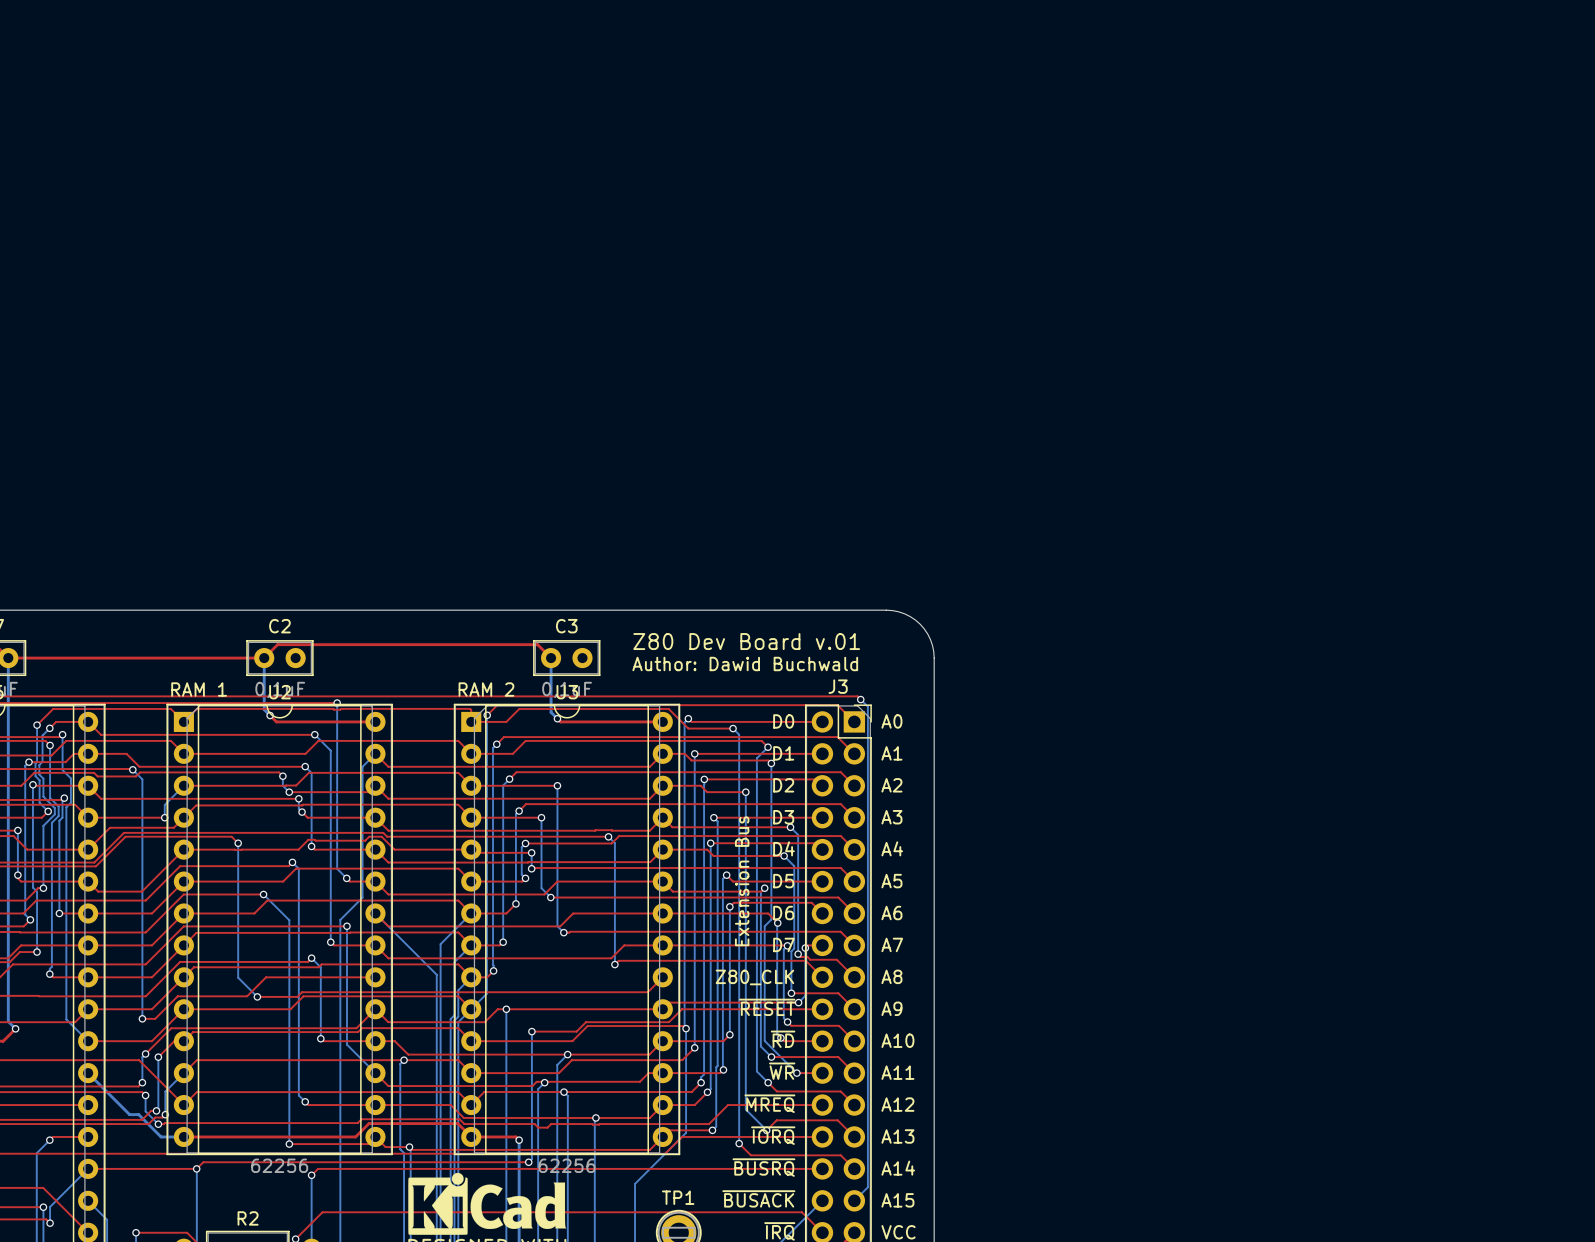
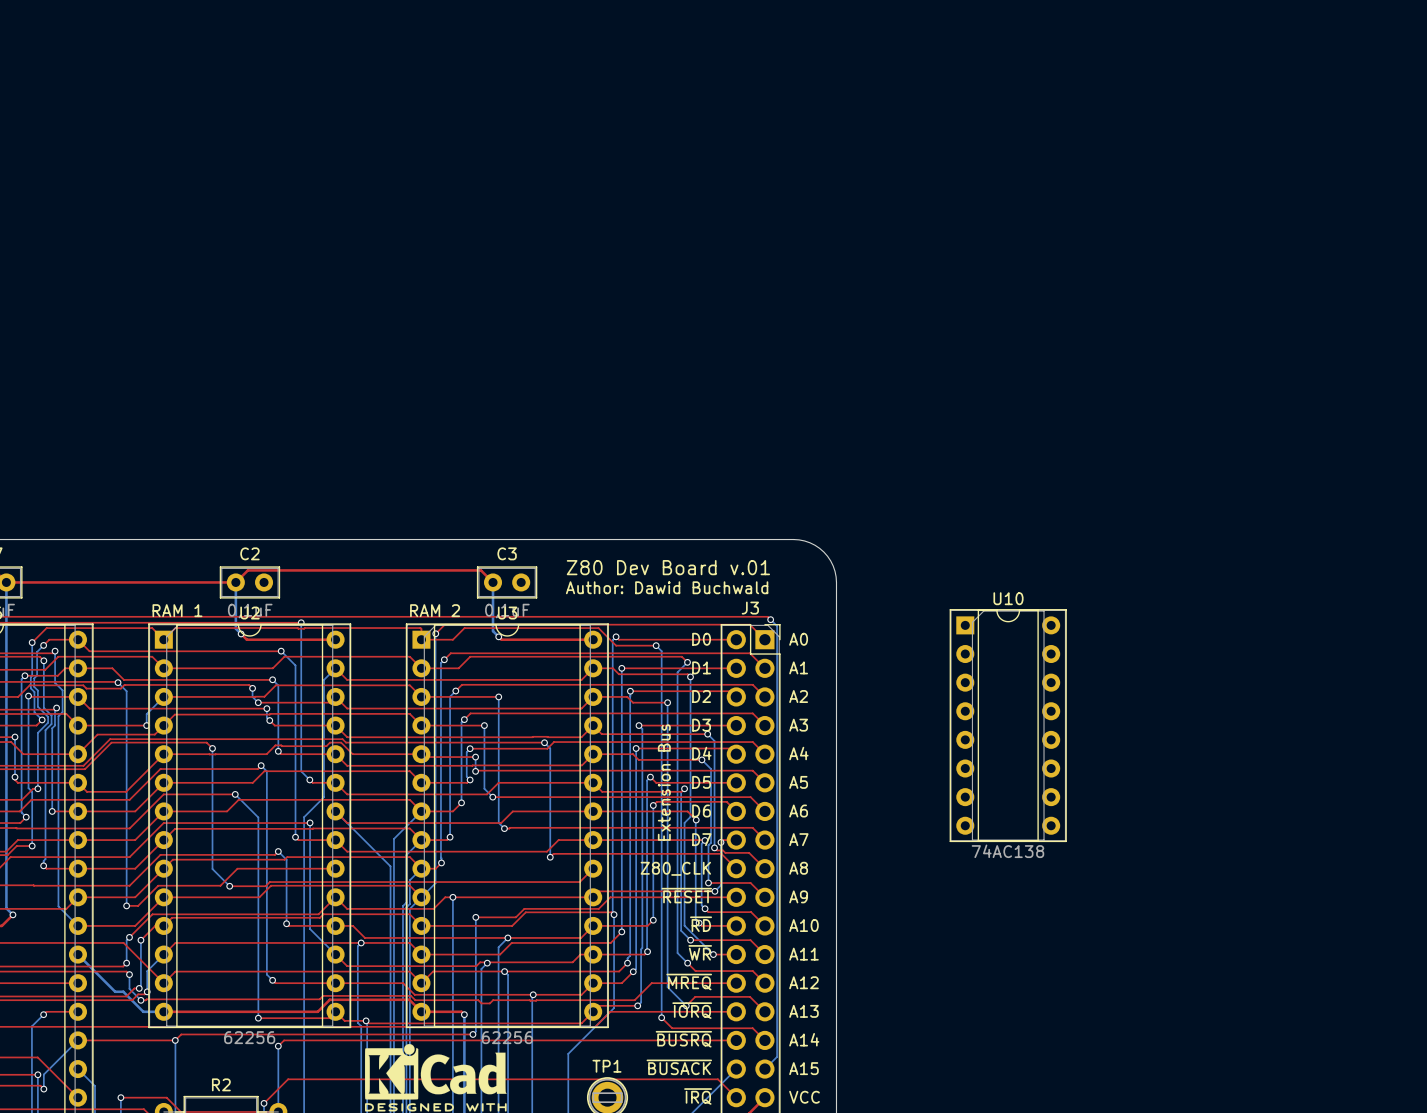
U10: none -> 74AC138 (1008, 725)

